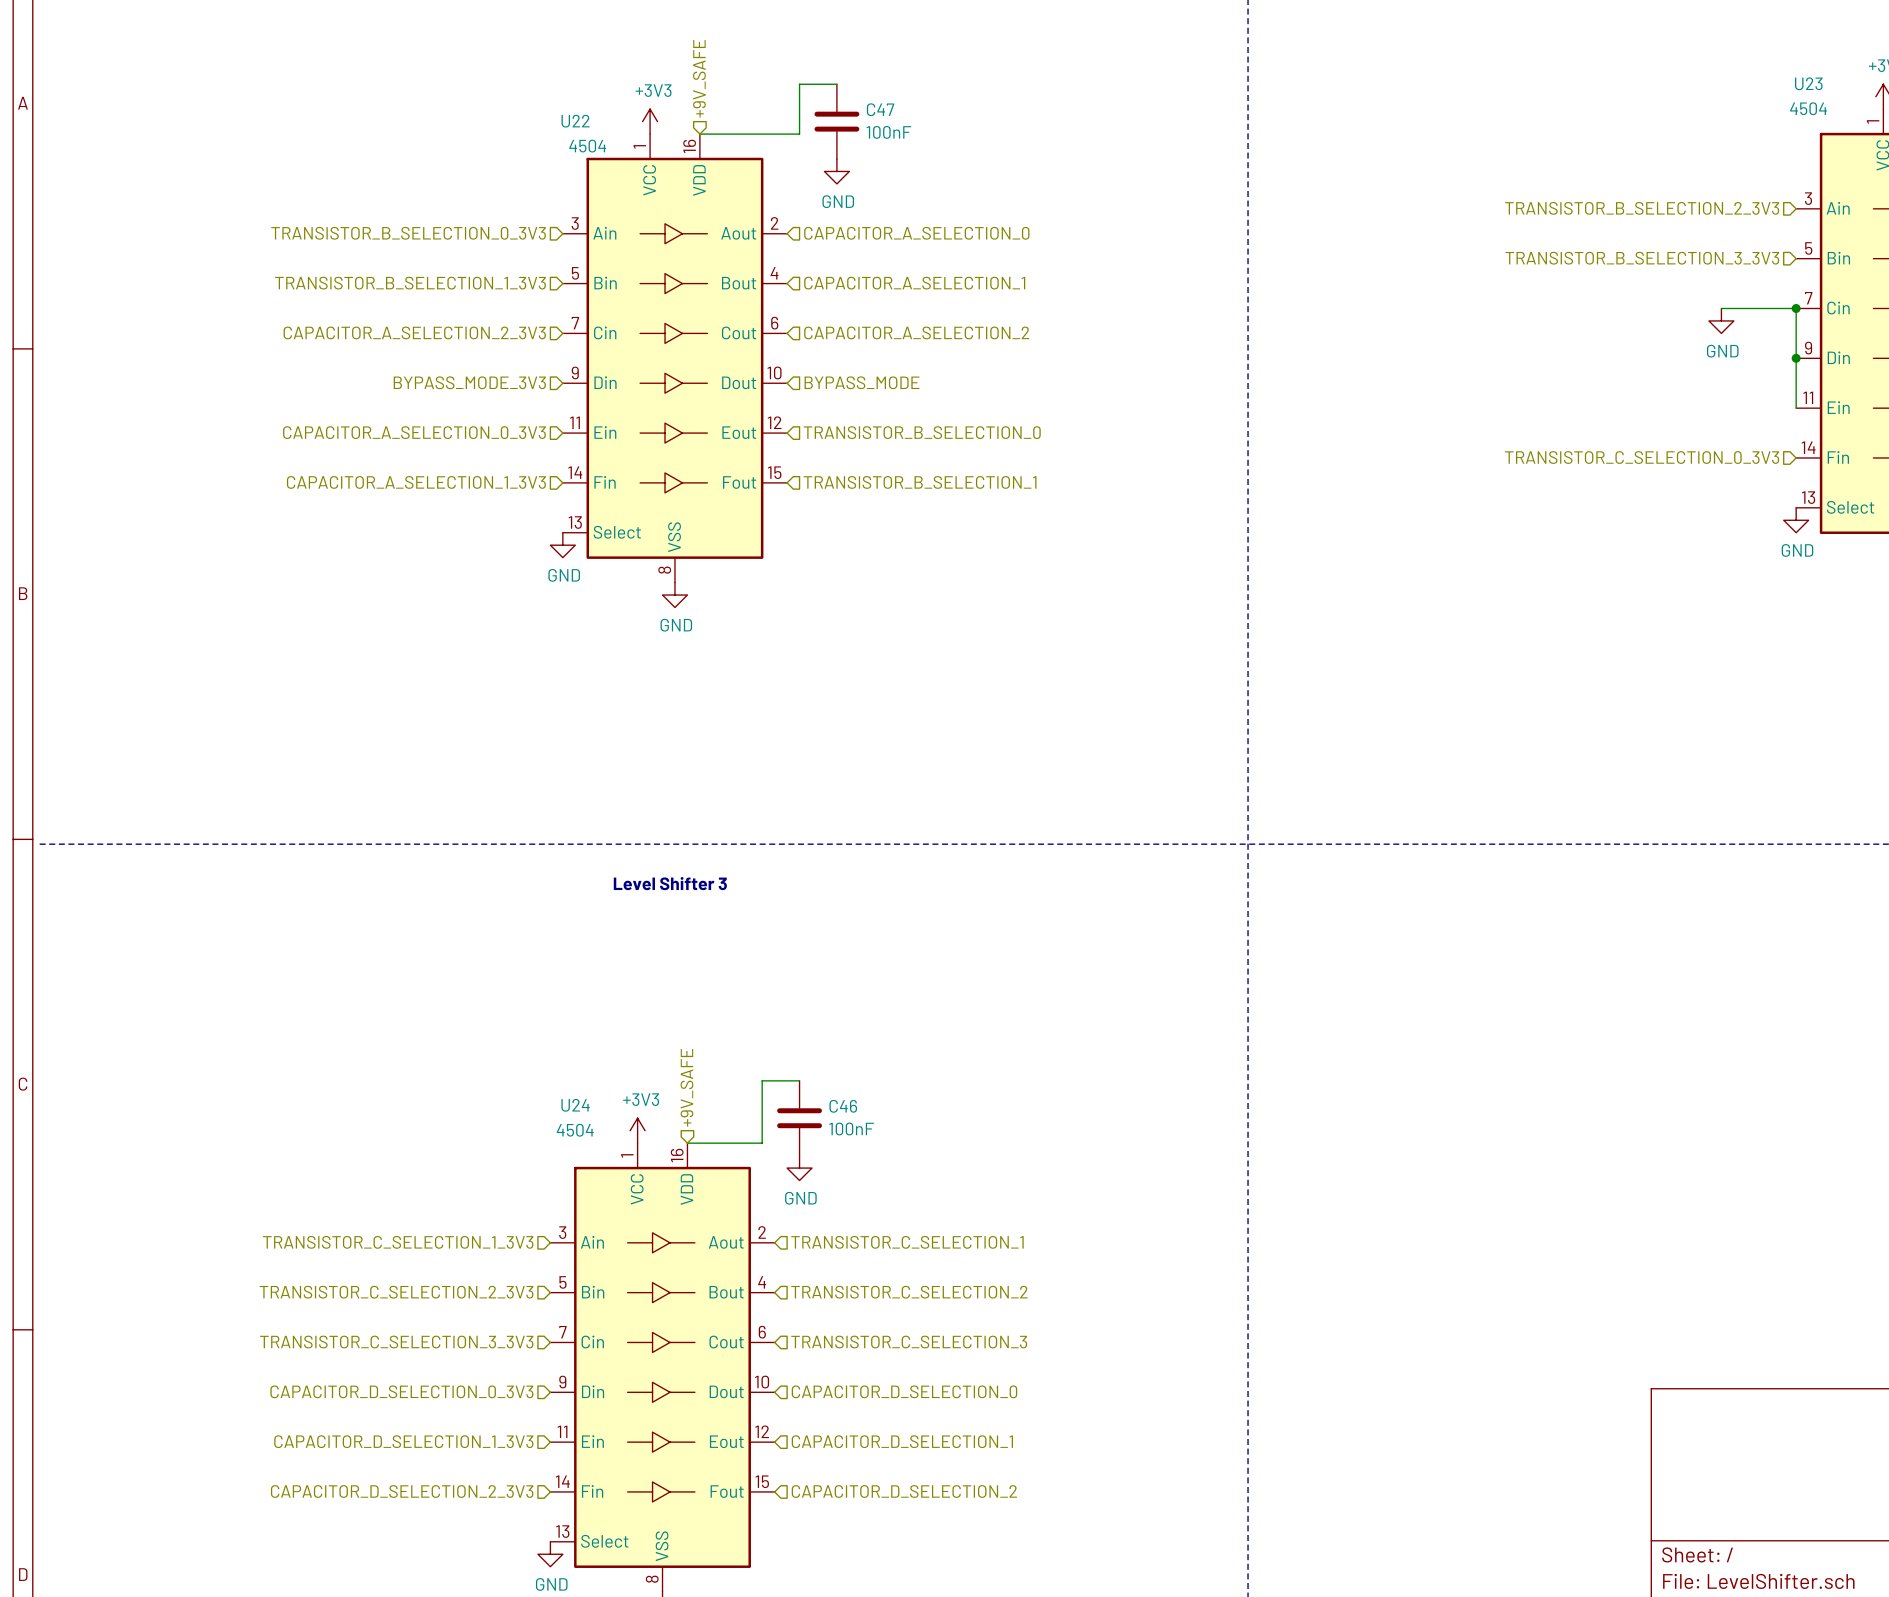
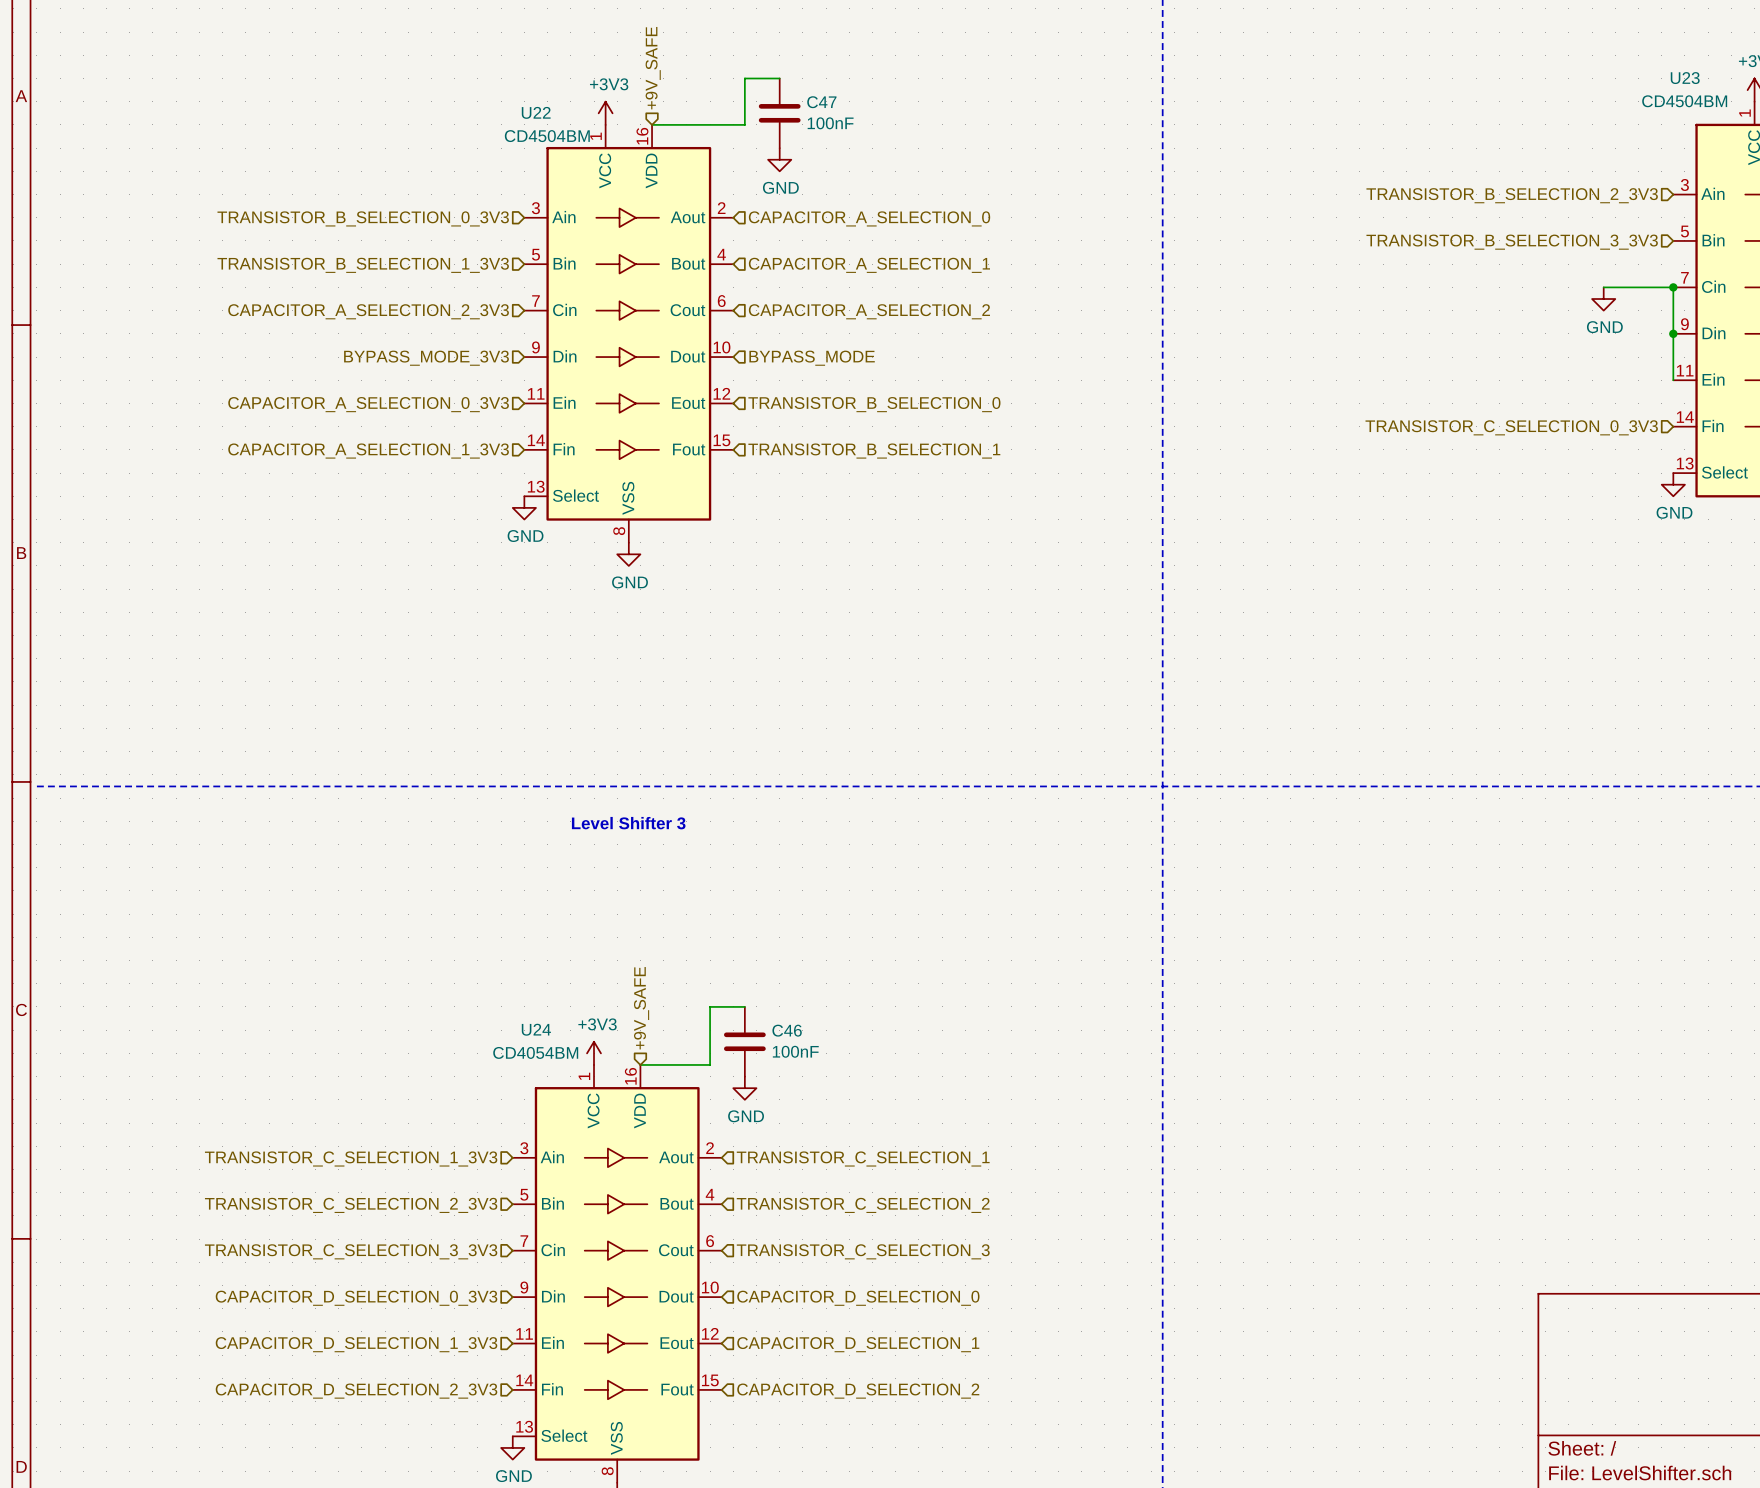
U23 value: 4504 (1808, 108) -> CD4504BM (1684, 101)
U22 value: 4504 (587, 146) -> CD4504BM (547, 136)
U24 value: 4504 (575, 1130) -> CD4054BM (535, 1052)

